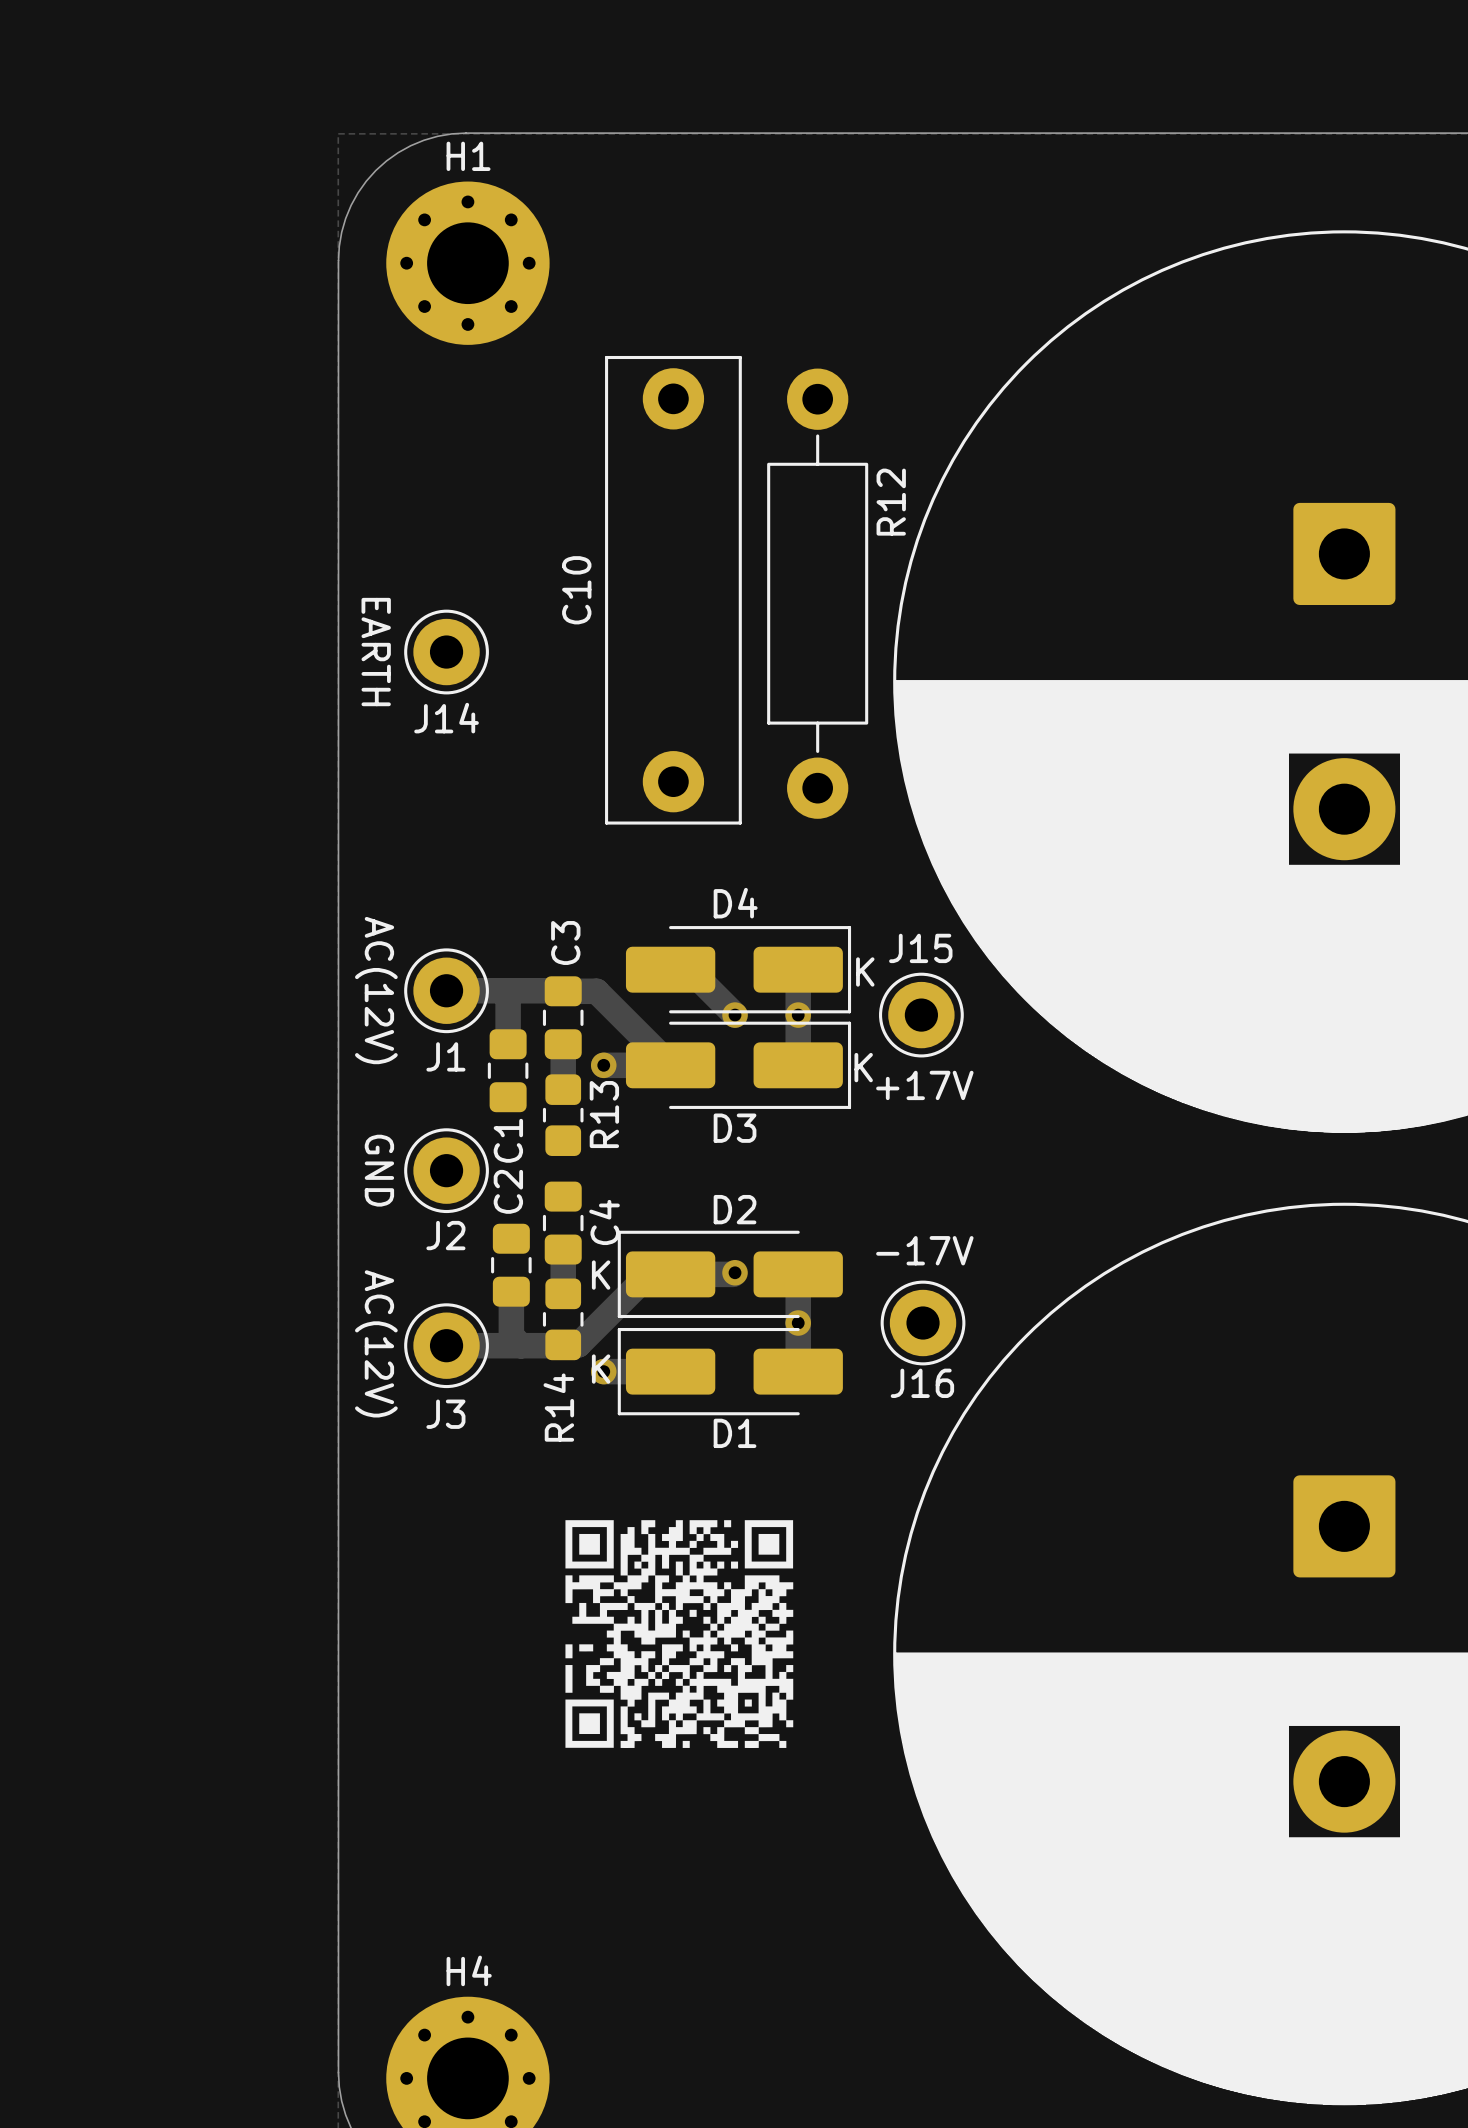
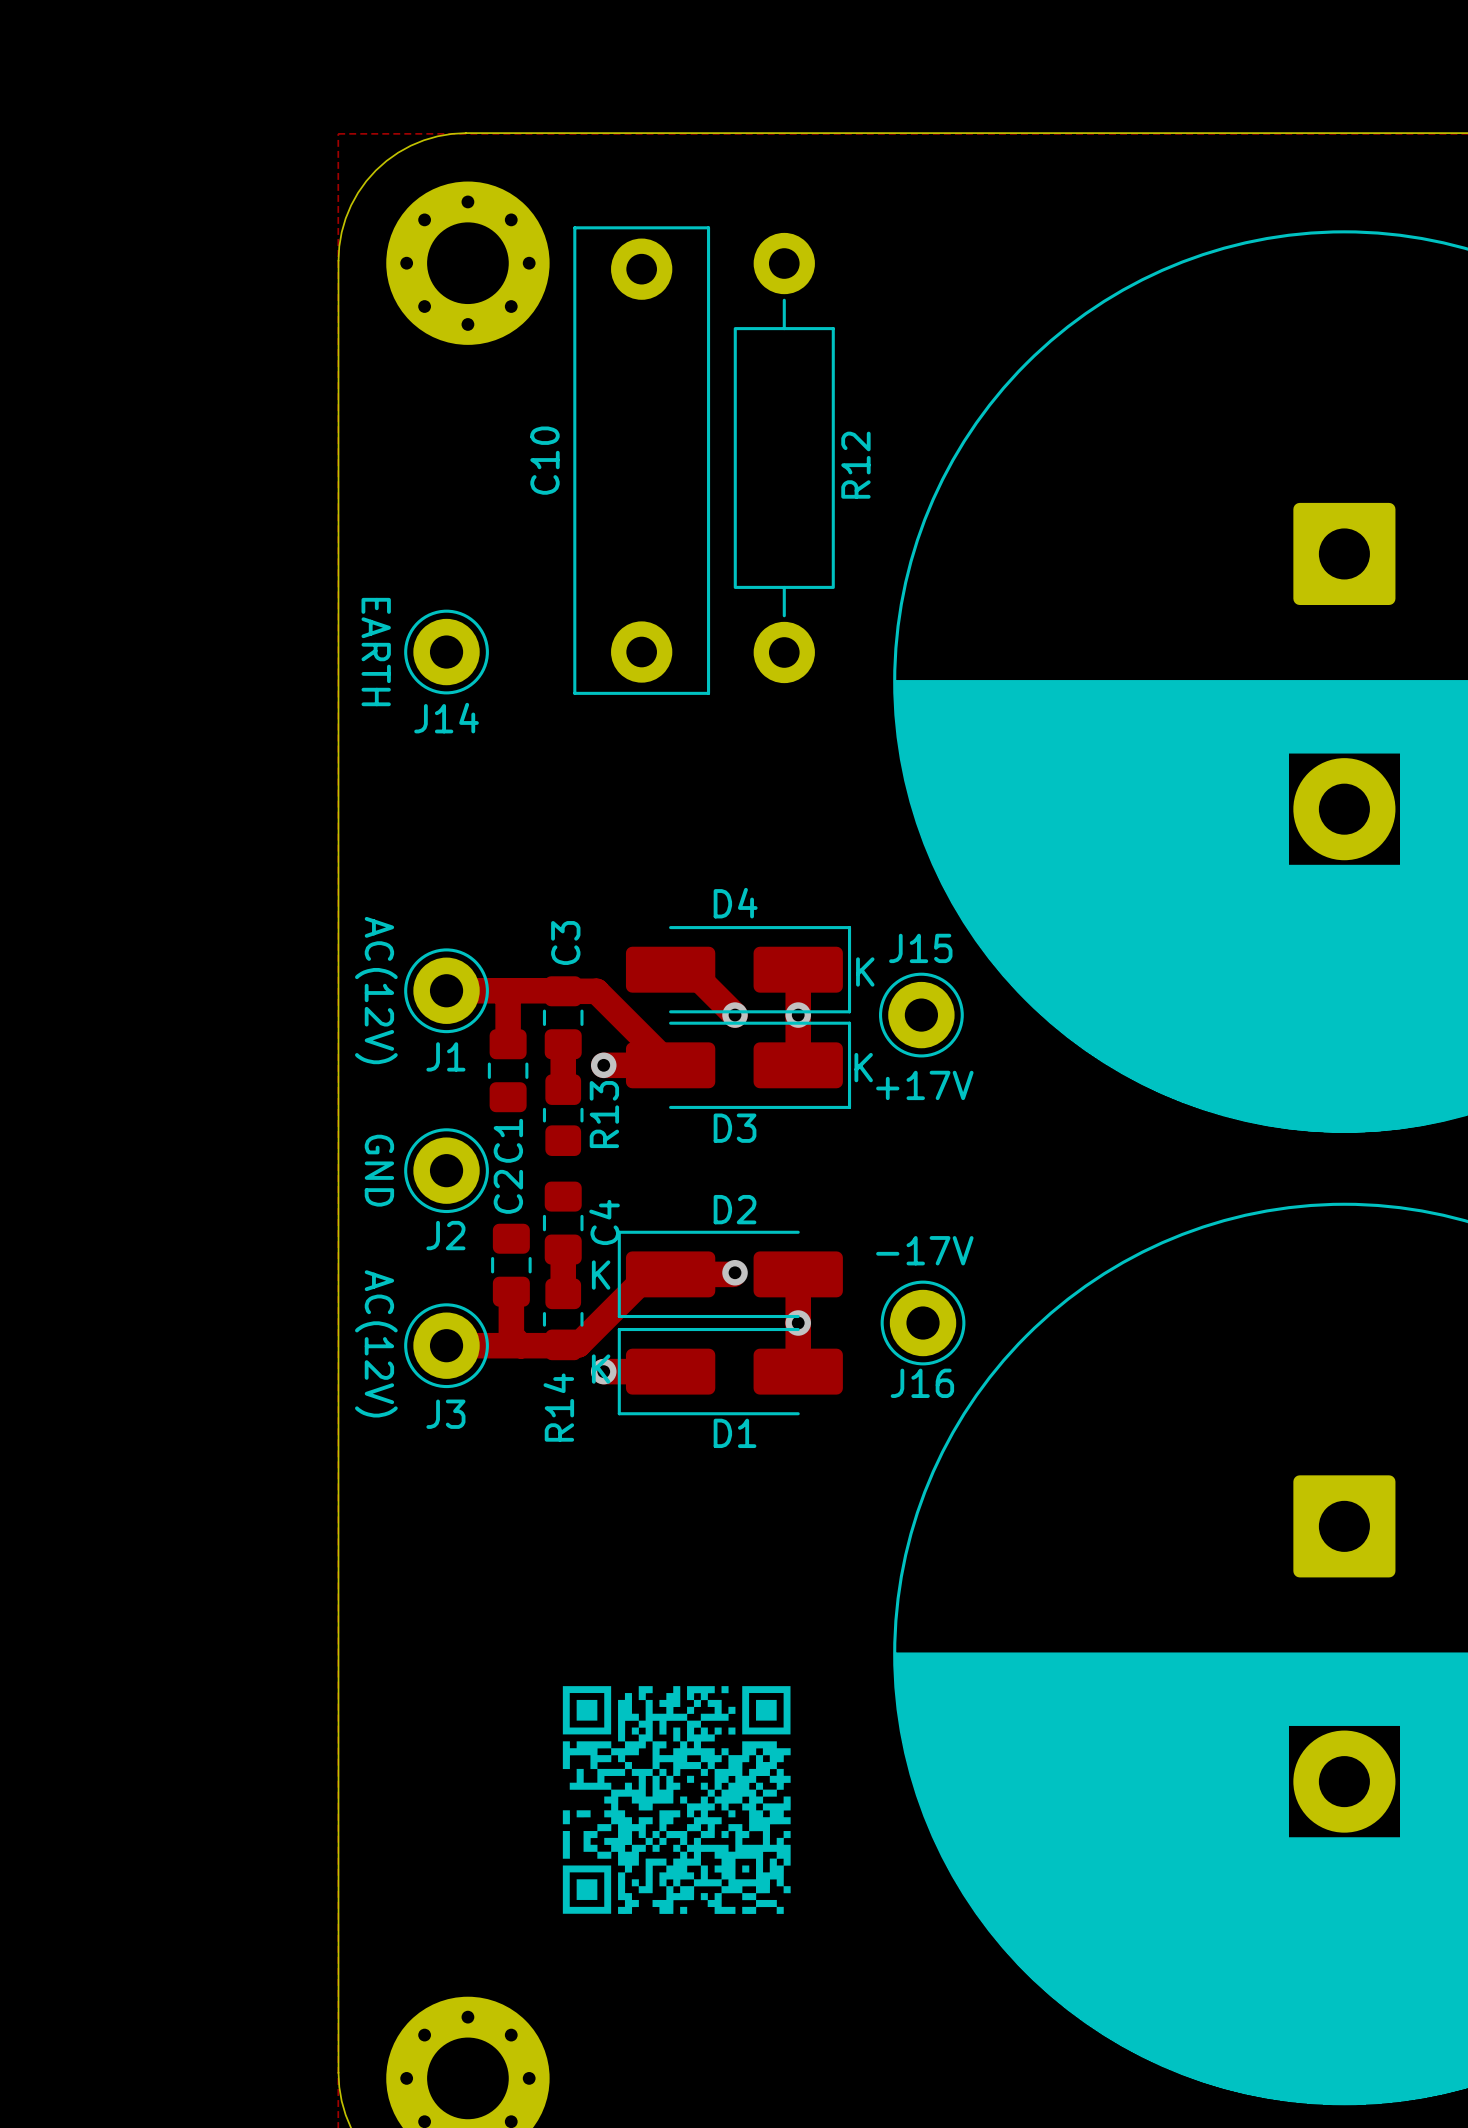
H1 name: H1 (468, 156) -> none
R12 name position: R12 (891, 502) -> R12 (855, 465)
C10 position: (673, 590) -> (641, 460)
R12 position: (817, 593) -> (784, 458)
drawing position: (679, 1634) -> (676, 1800)
H4 name: H4 (469, 1970) -> none

